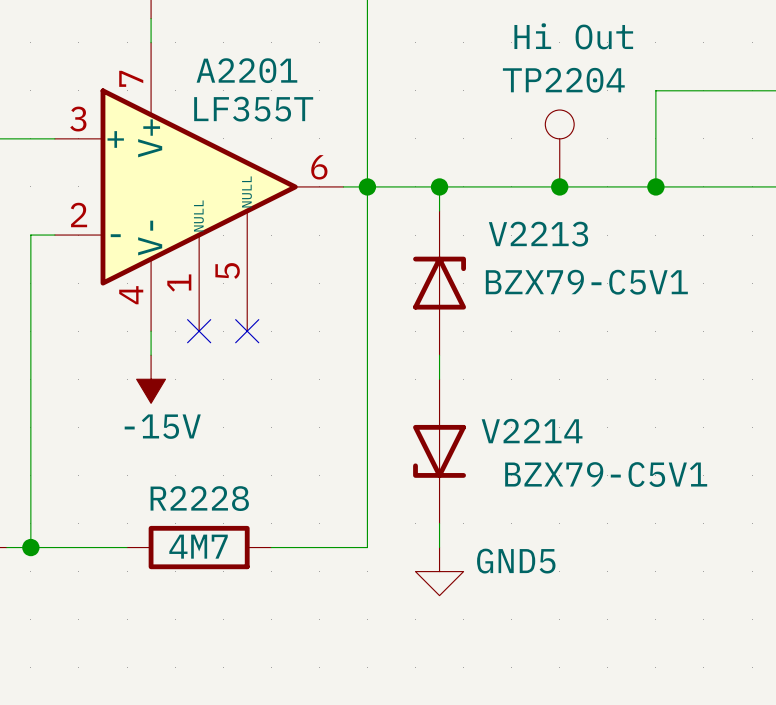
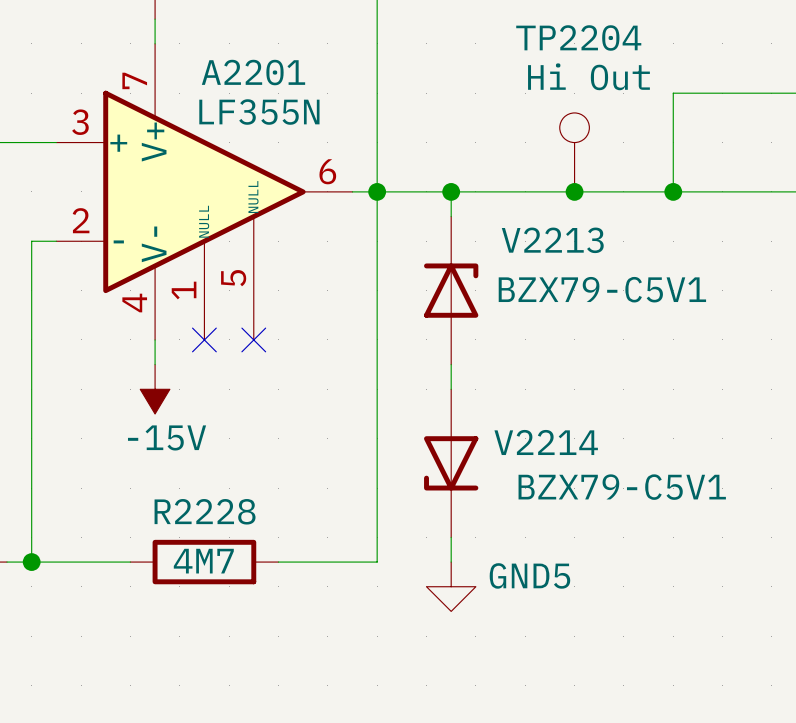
TP2204 value position: Hi Out (573, 36) -> Hi Out (588, 76)
TP2204 name position: TP2204 (563, 80) -> TP2204 (578, 37)
A2201 value: LF355T (253, 109) -> LF355N (259, 112)

